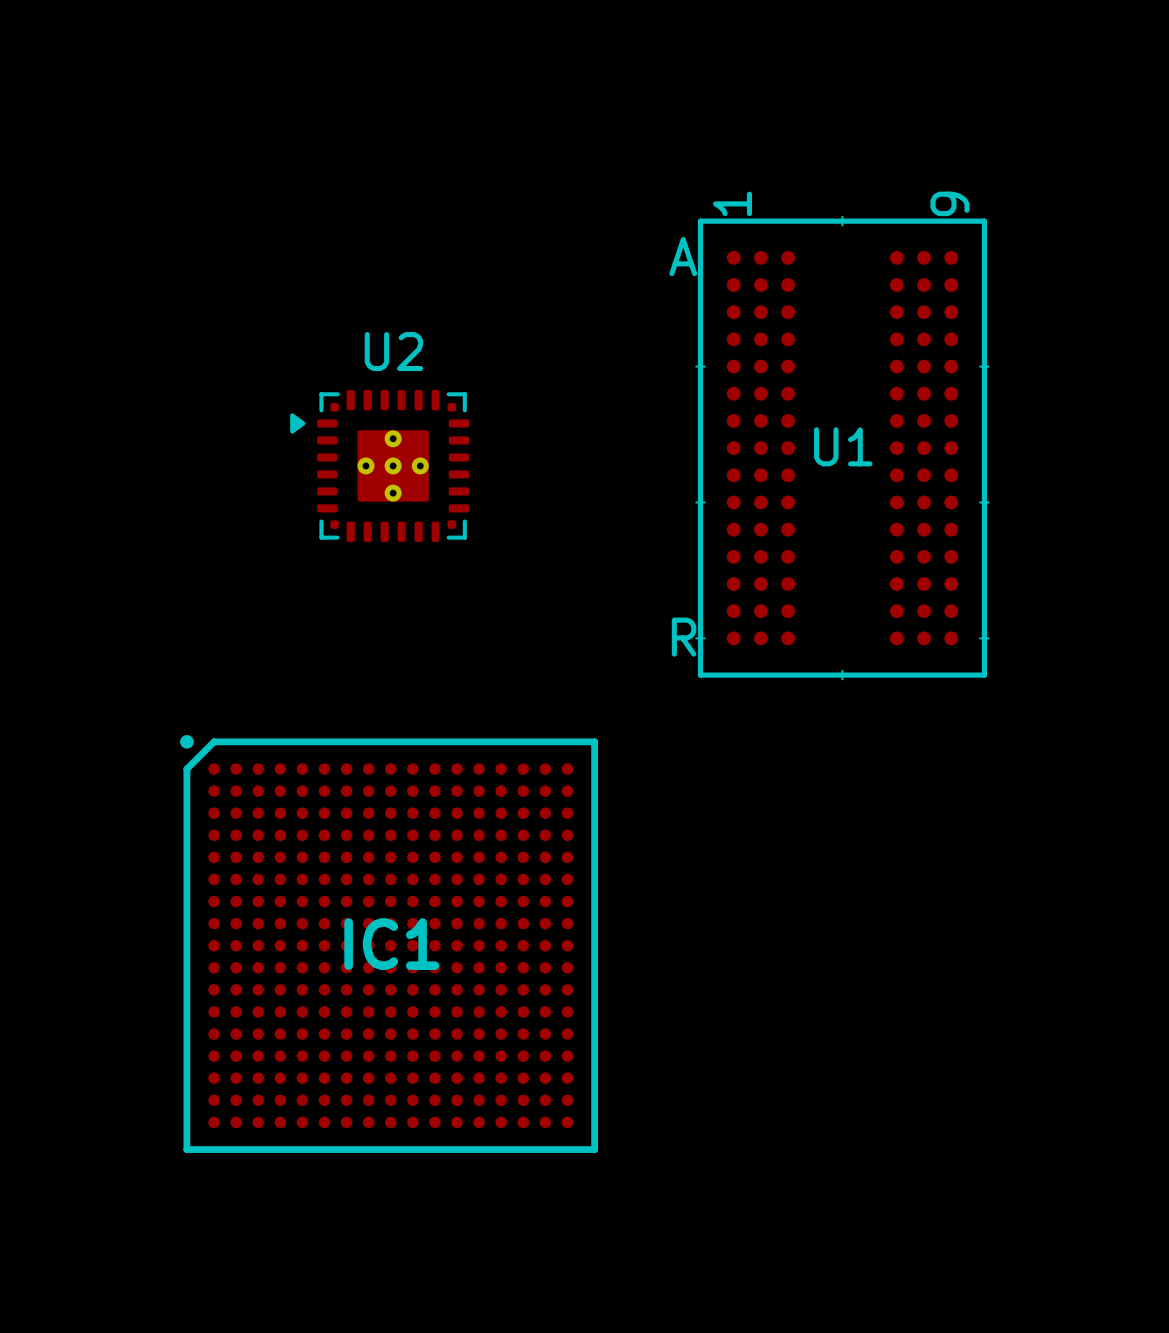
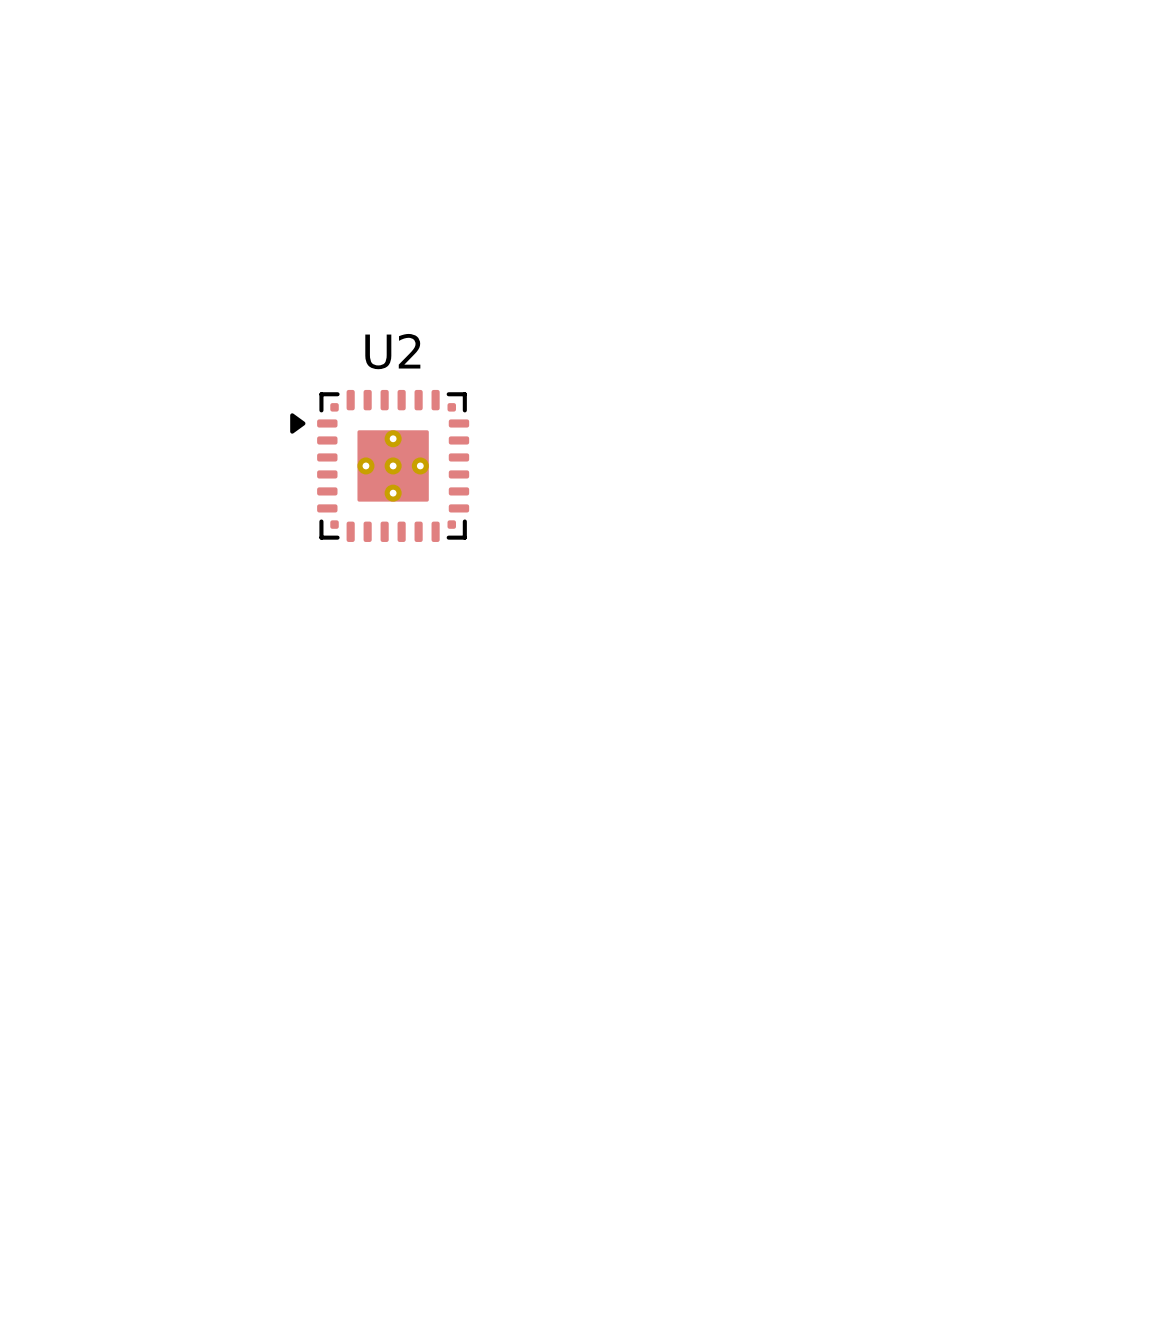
U1: (842, 448) -> none
IC1: (389, 944) -> none

